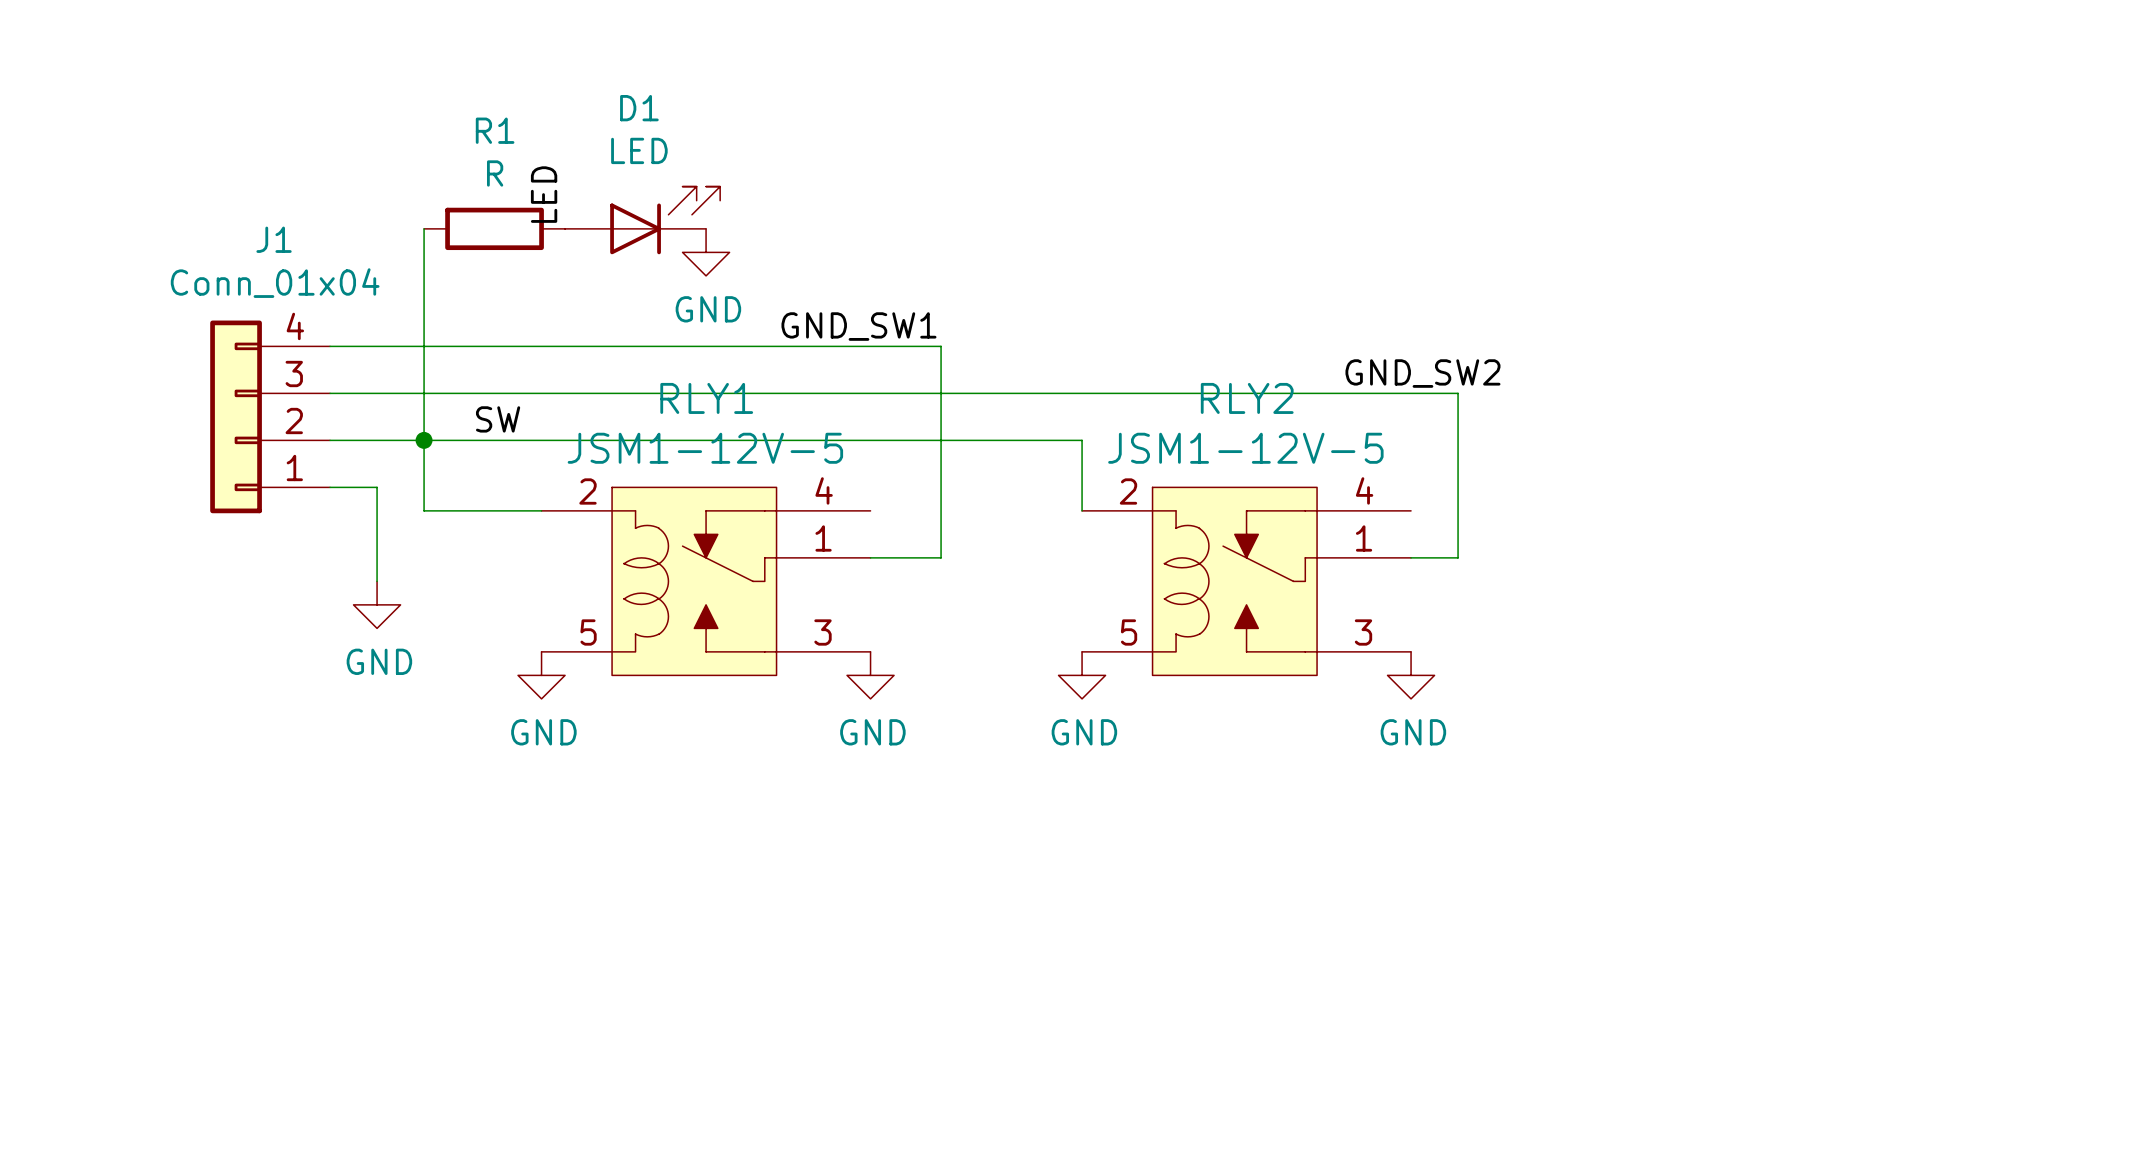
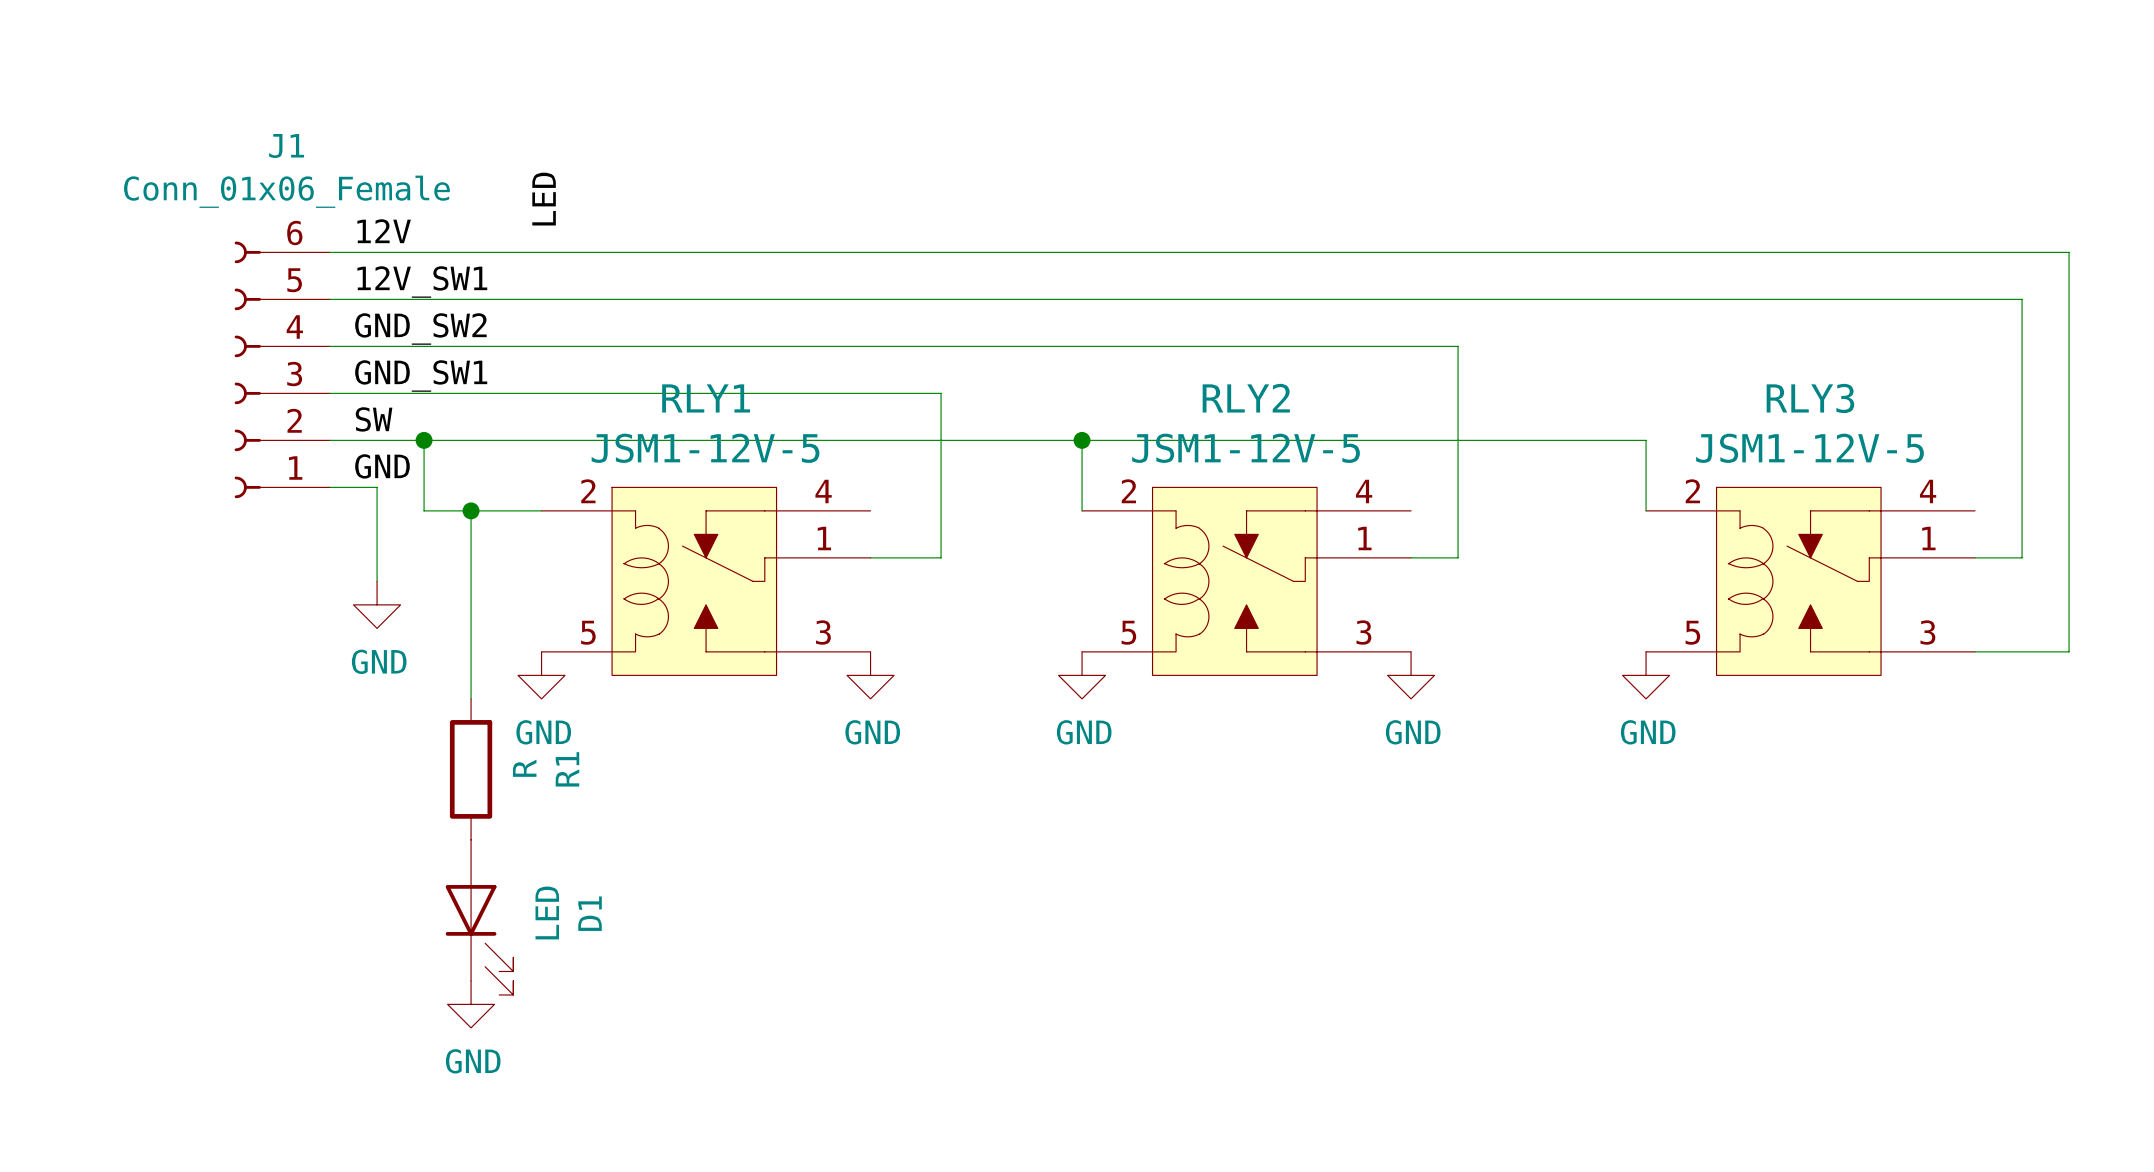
D1 position: (642, 220) -> (479, 917)
D1 rotation: 0° (665, 220) -> 90° clockwise (479, 939)
wire: (424, 228) (424, 440) -> none
R1 rotation: 0° (494, 228) -> 90° clockwise (471, 769)
R1 position: (494, 228) -> (471, 769)
label: none -> 12V (384, 231)
J1 name position: J1 (274, 239) -> J1 (286, 145)
wire: none -> (330, 252) (2069, 252) (2069, 651) (1975, 651)
power symbol: GND (706, 252) -> none
label: none -> 12V_SW1 (422, 282)
J1 value: Conn_01x04 (275, 283) -> Conn_01x06_Female (286, 191)
wire: none -> (330, 299) (2022, 299) (2022, 557) (1975, 557)
J1 symbol: [210, 320, 331, 514] -> [234, 241, 331, 499]
label: none -> GND_SW2 (420, 329)
label position: GND_SW1 (858, 326) -> GND_SW1 (421, 376)
wire: (941, 346) (941, 393) (1458, 393) -> (941, 346) (1458, 346) (1458, 393)
label: GND_SW2 (1422, 373) -> none
label position: SW (498, 419) -> SW (374, 419)
wire: none -> (1082, 440) (1646, 440) (1646, 510)
junction: none -> (1082, 440)
label: none -> GND (382, 466)
wire: none -> (471, 510) (471, 698)
junction: none -> (471, 510)
RLY3: none -> JSM1-12V-5 (1810, 581)
power symbol: none -> GND (1646, 675)
power symbol: none -> GND (471, 1004)

